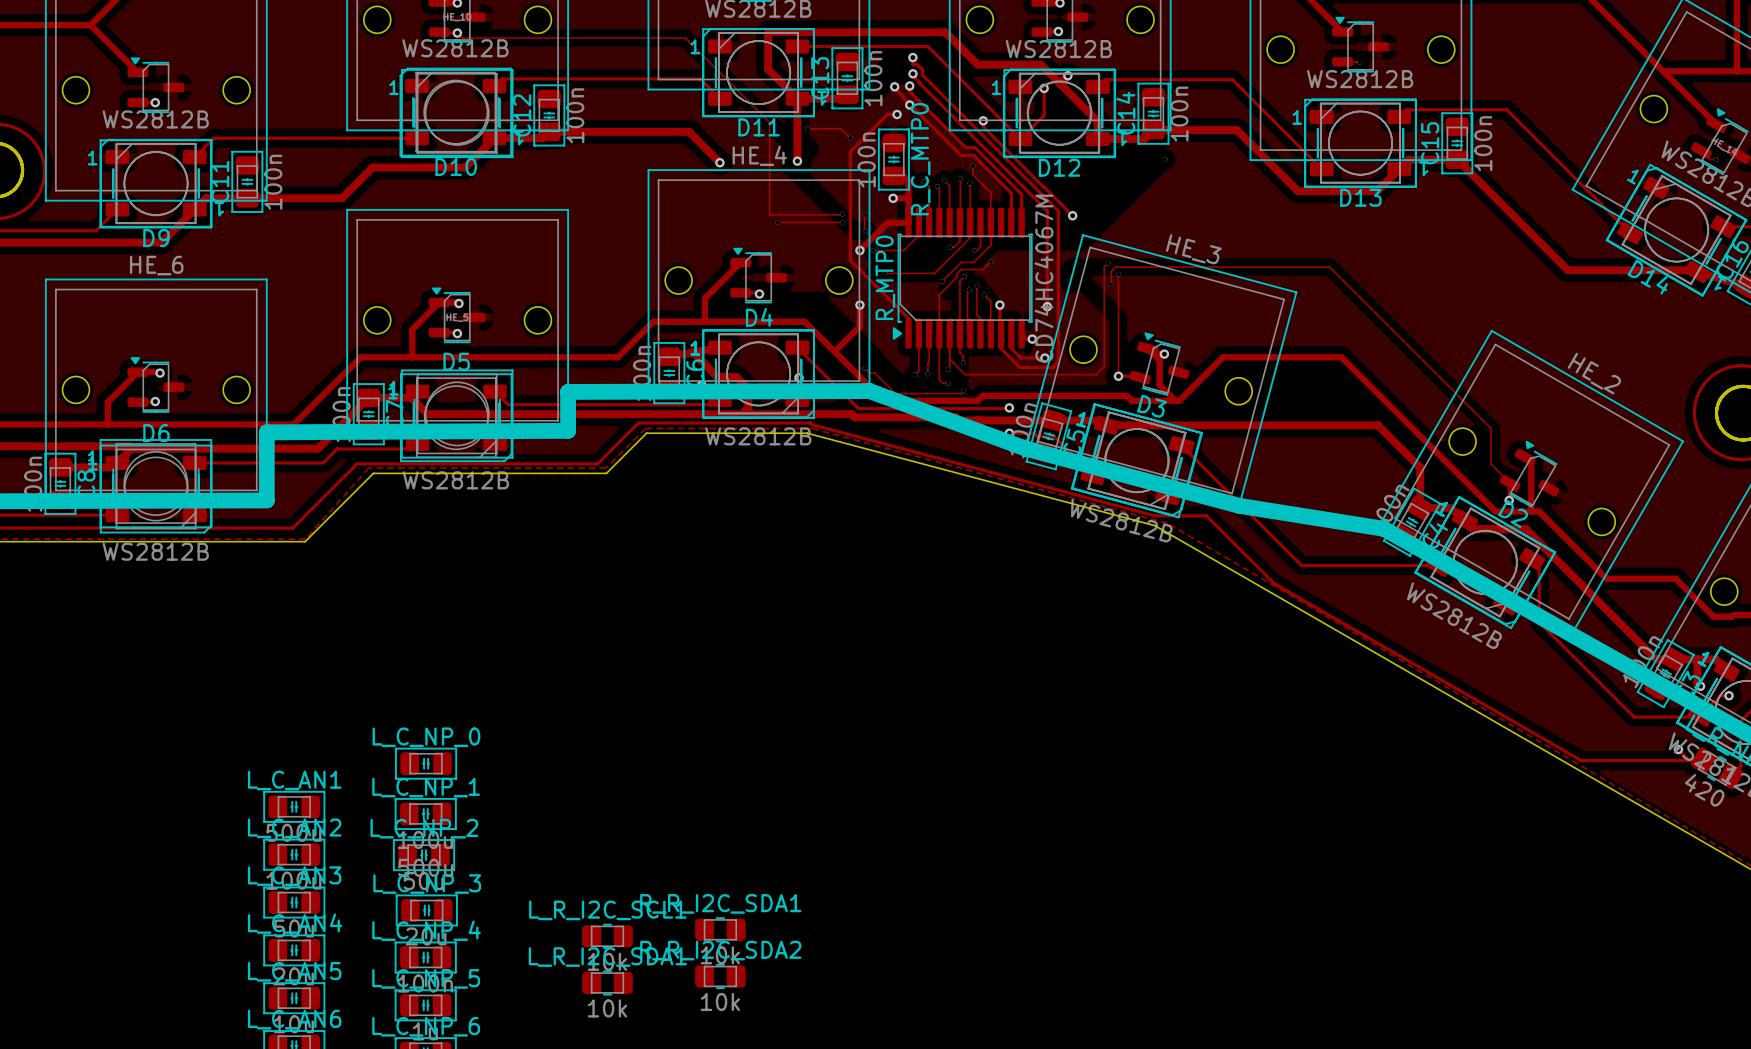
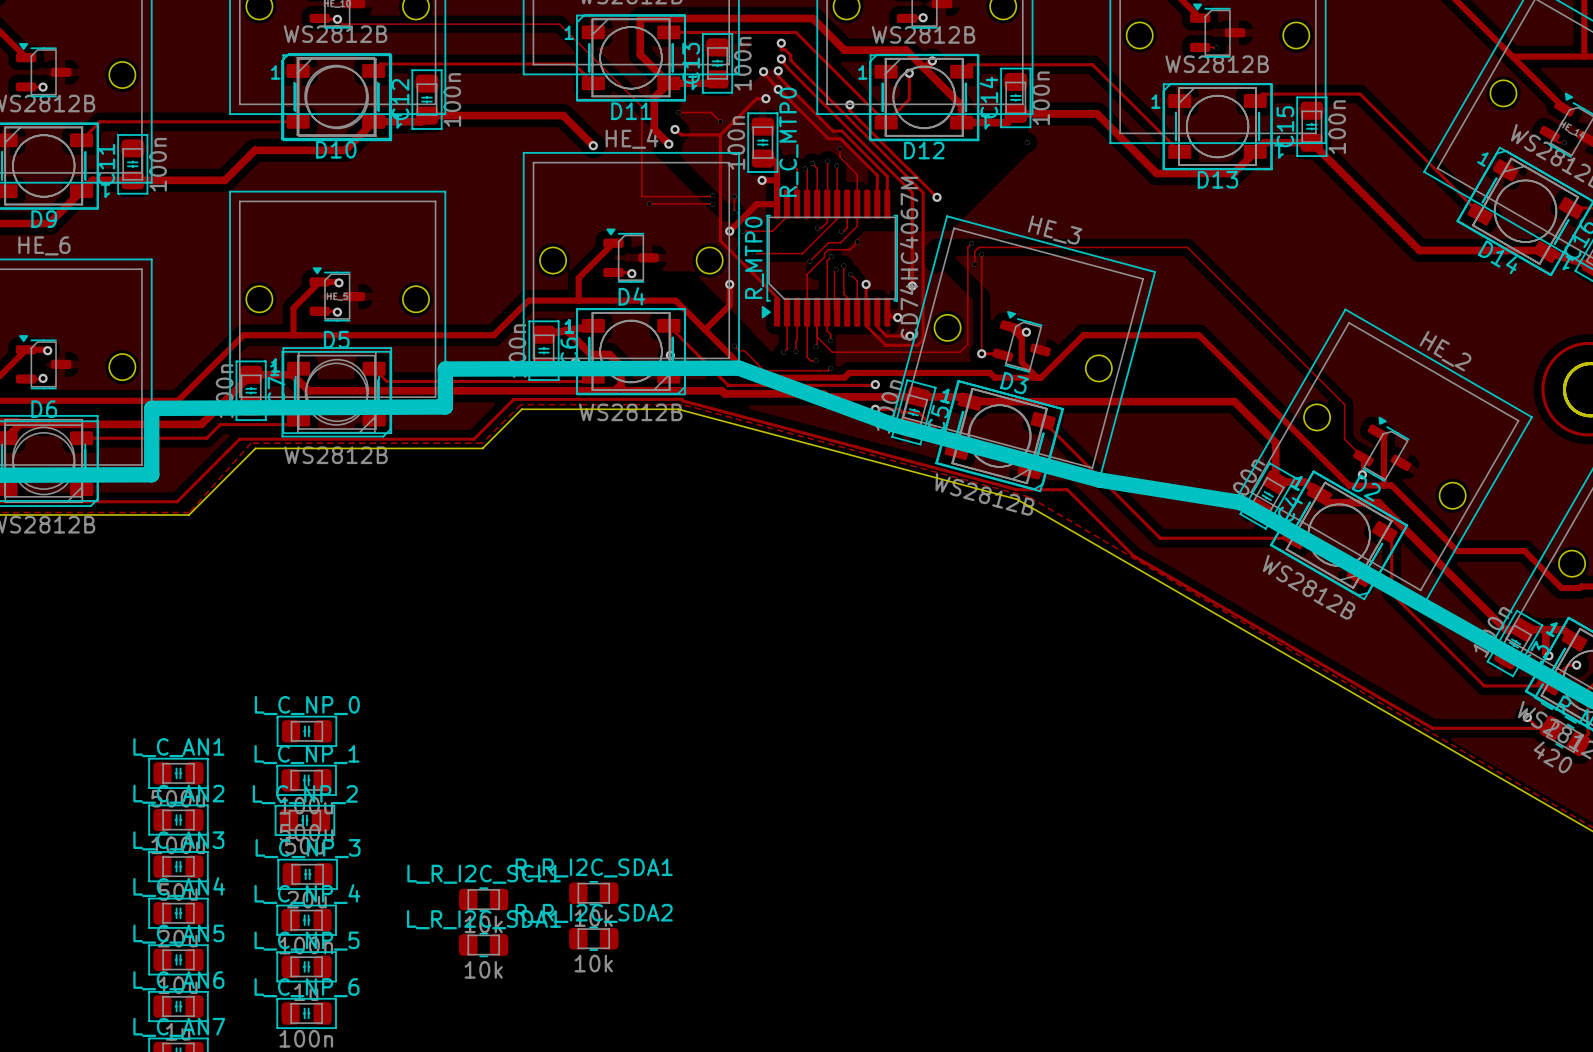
track: (797, 98) (797, 161) -> (668, 83) (654, 97) (654, 129) (668, 144)
track: none -> (675, 129) (681, 134) (720, 134)
via: none -> (675, 129)

